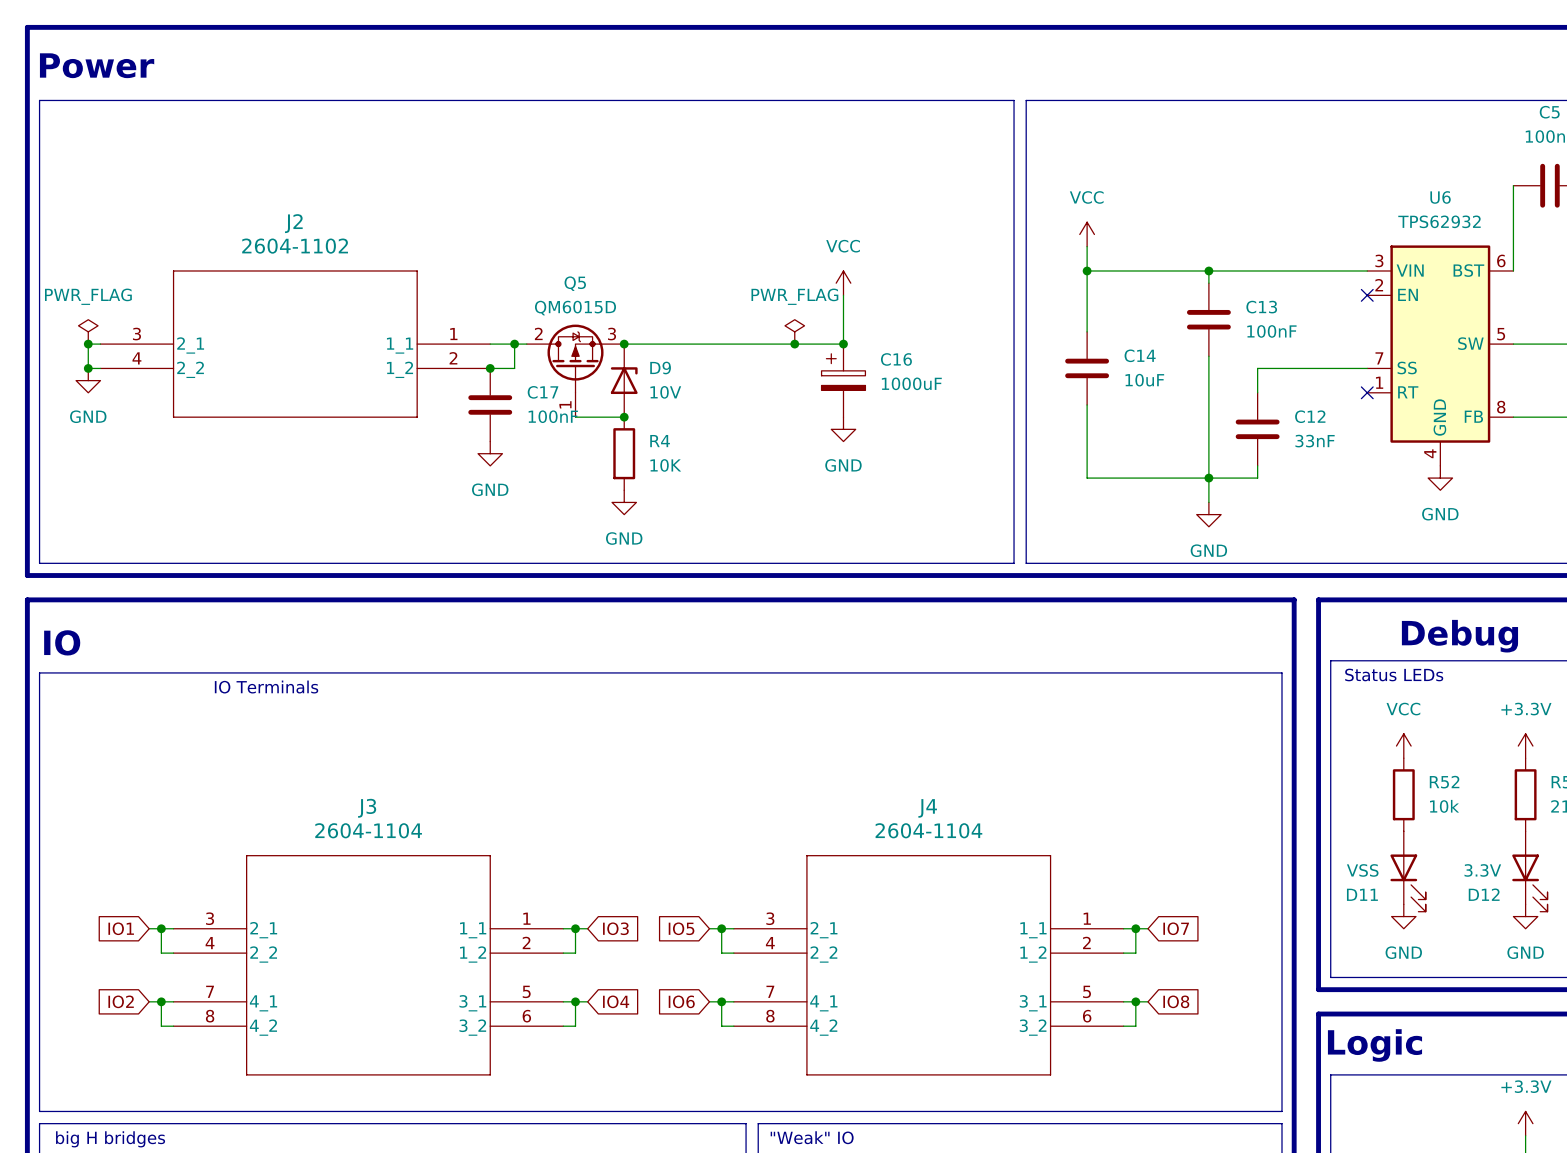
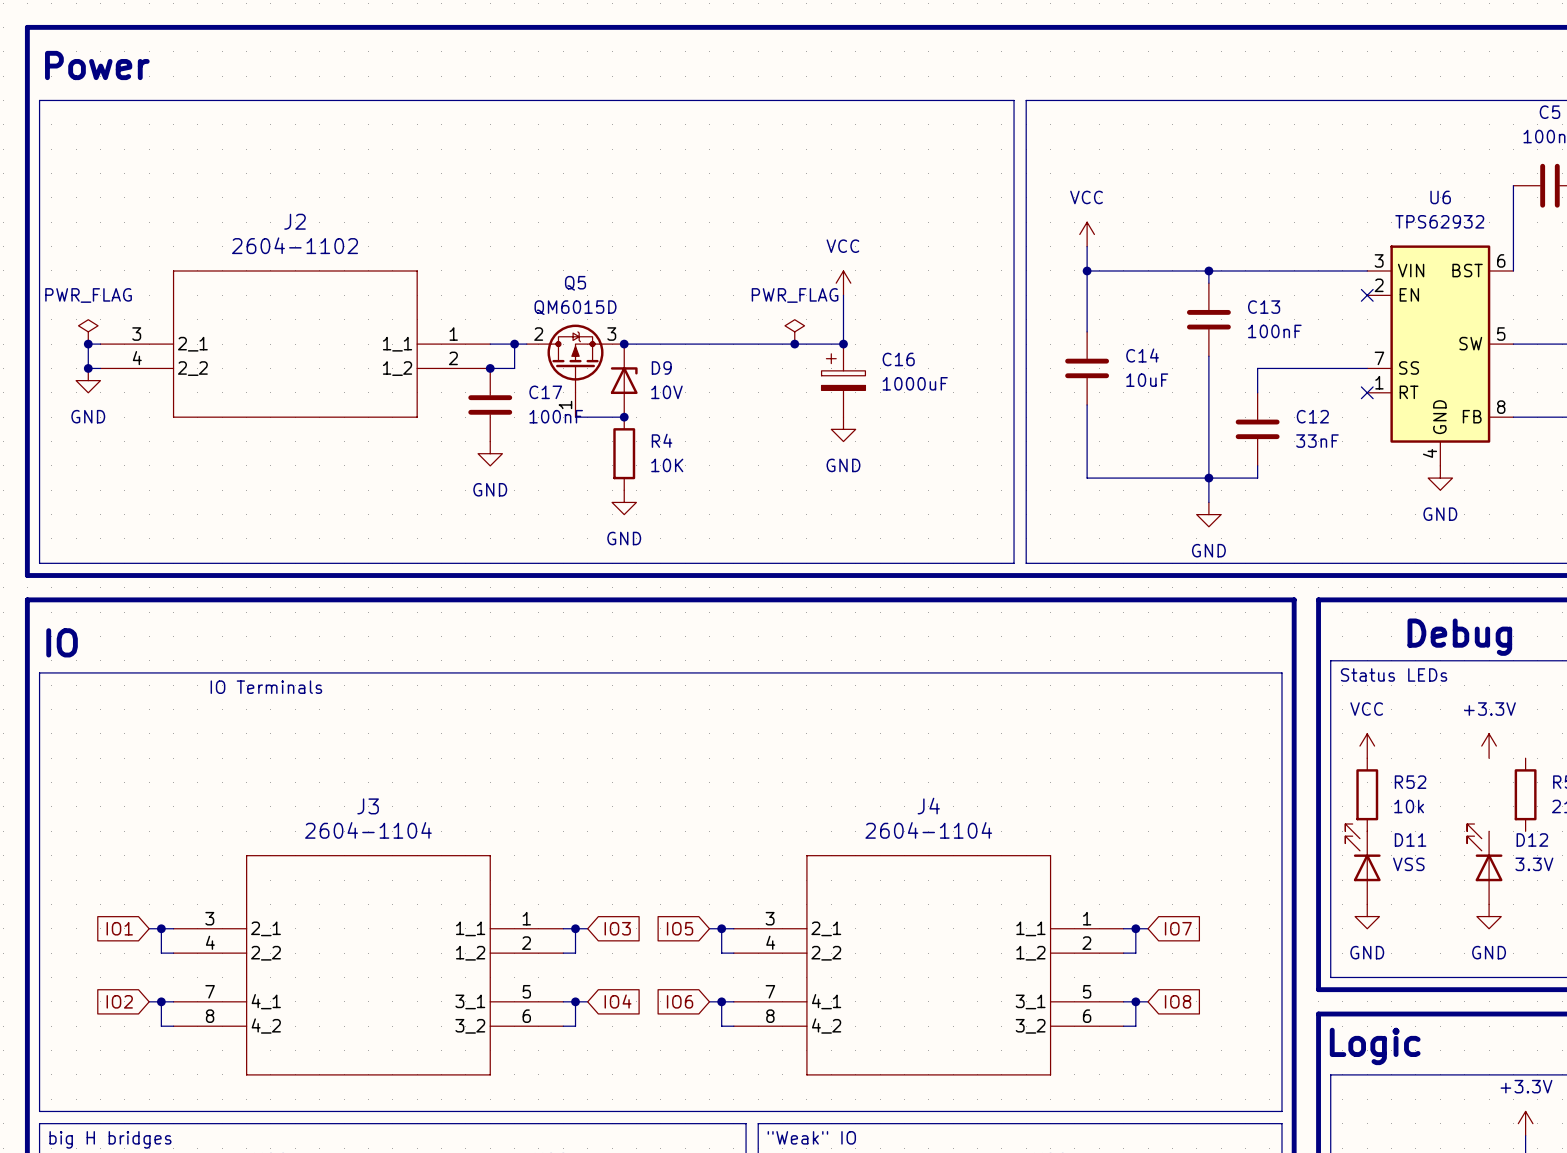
power symbol position: VCC (1403, 746) -> VCC (1367, 746)
power symbol position: +3.3V (1525, 746) -> +3.3V (1489, 746)
R52 position: (1403, 794) -> (1367, 794)
D11 rotation: 0° (1408, 883) -> 180° (1363, 852)
D12 rotation: 0° (1529, 883) -> 180° (1484, 852)
power symbol position: GND (1403, 916) -> GND (1367, 916)
power symbol: none -> GND (1489, 916)
power symbol: GND (1525, 916) -> none

